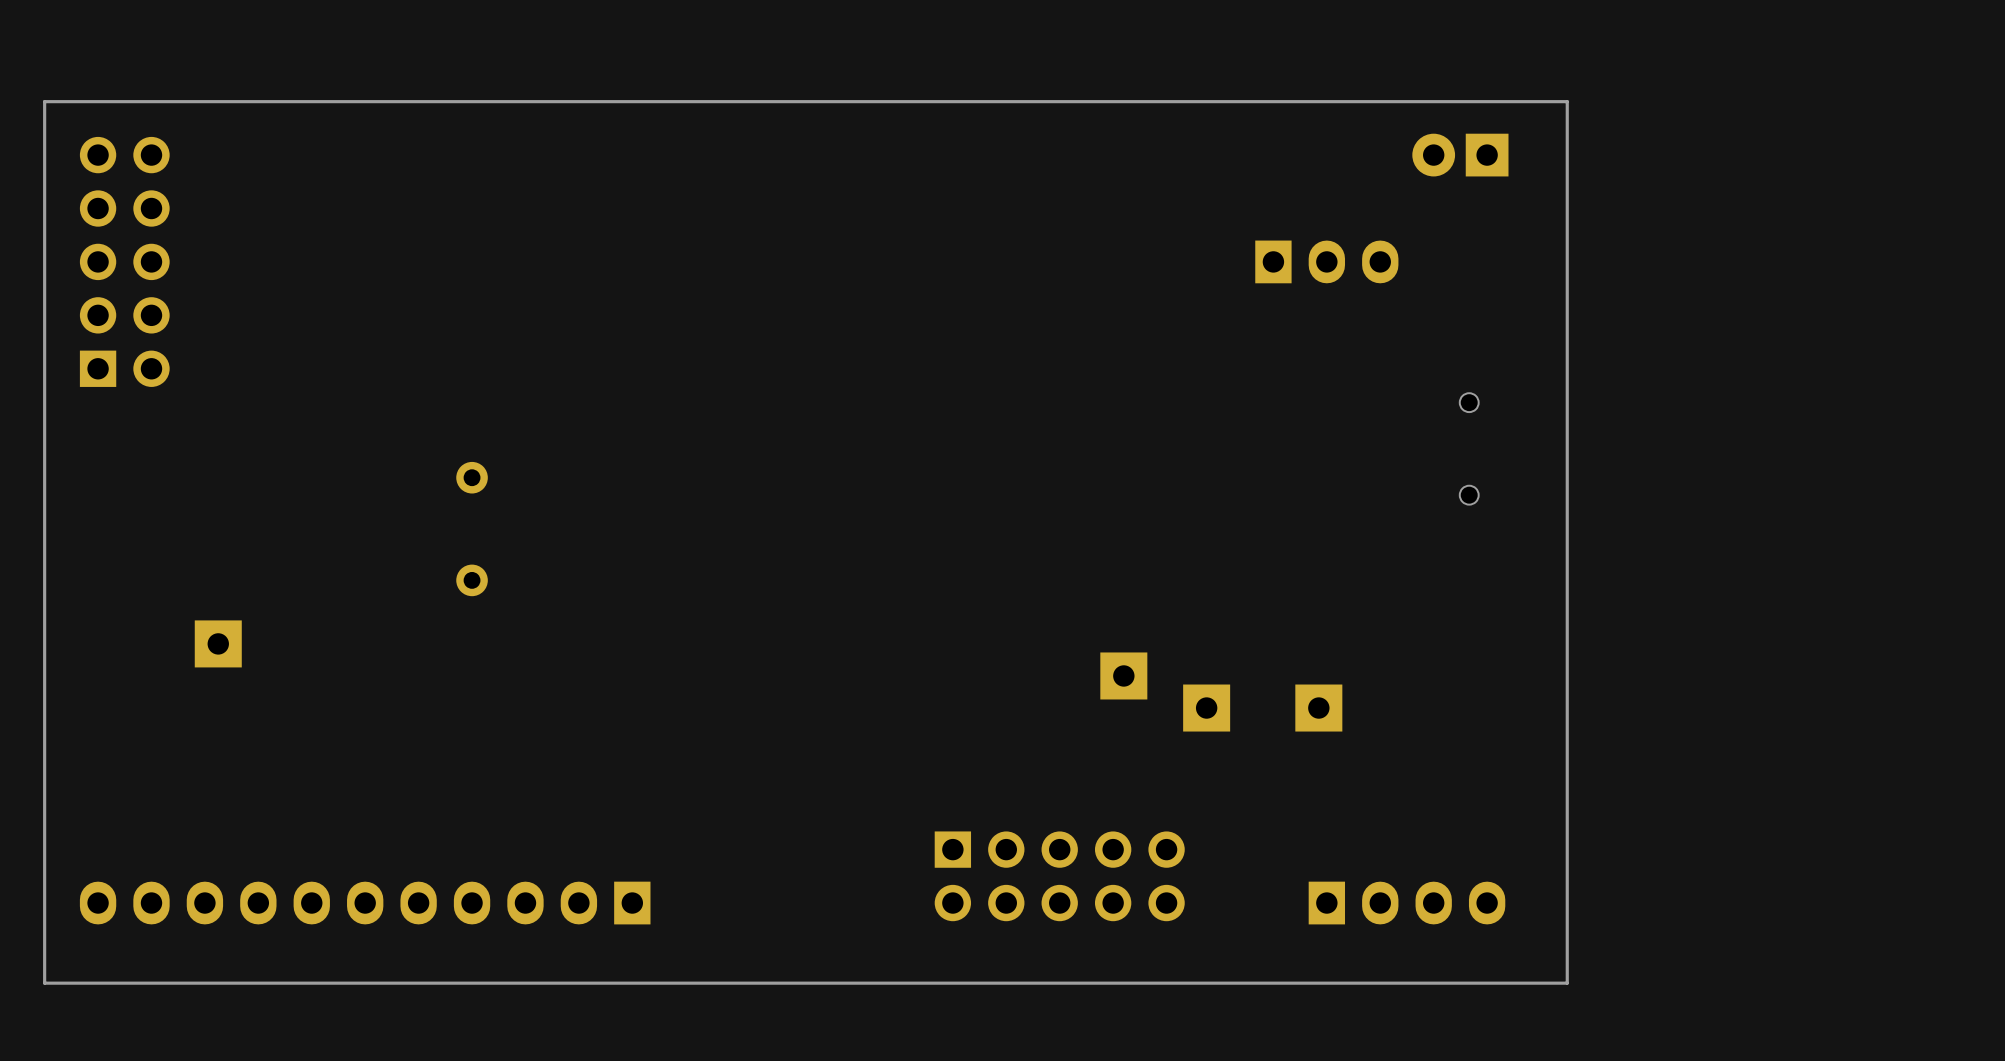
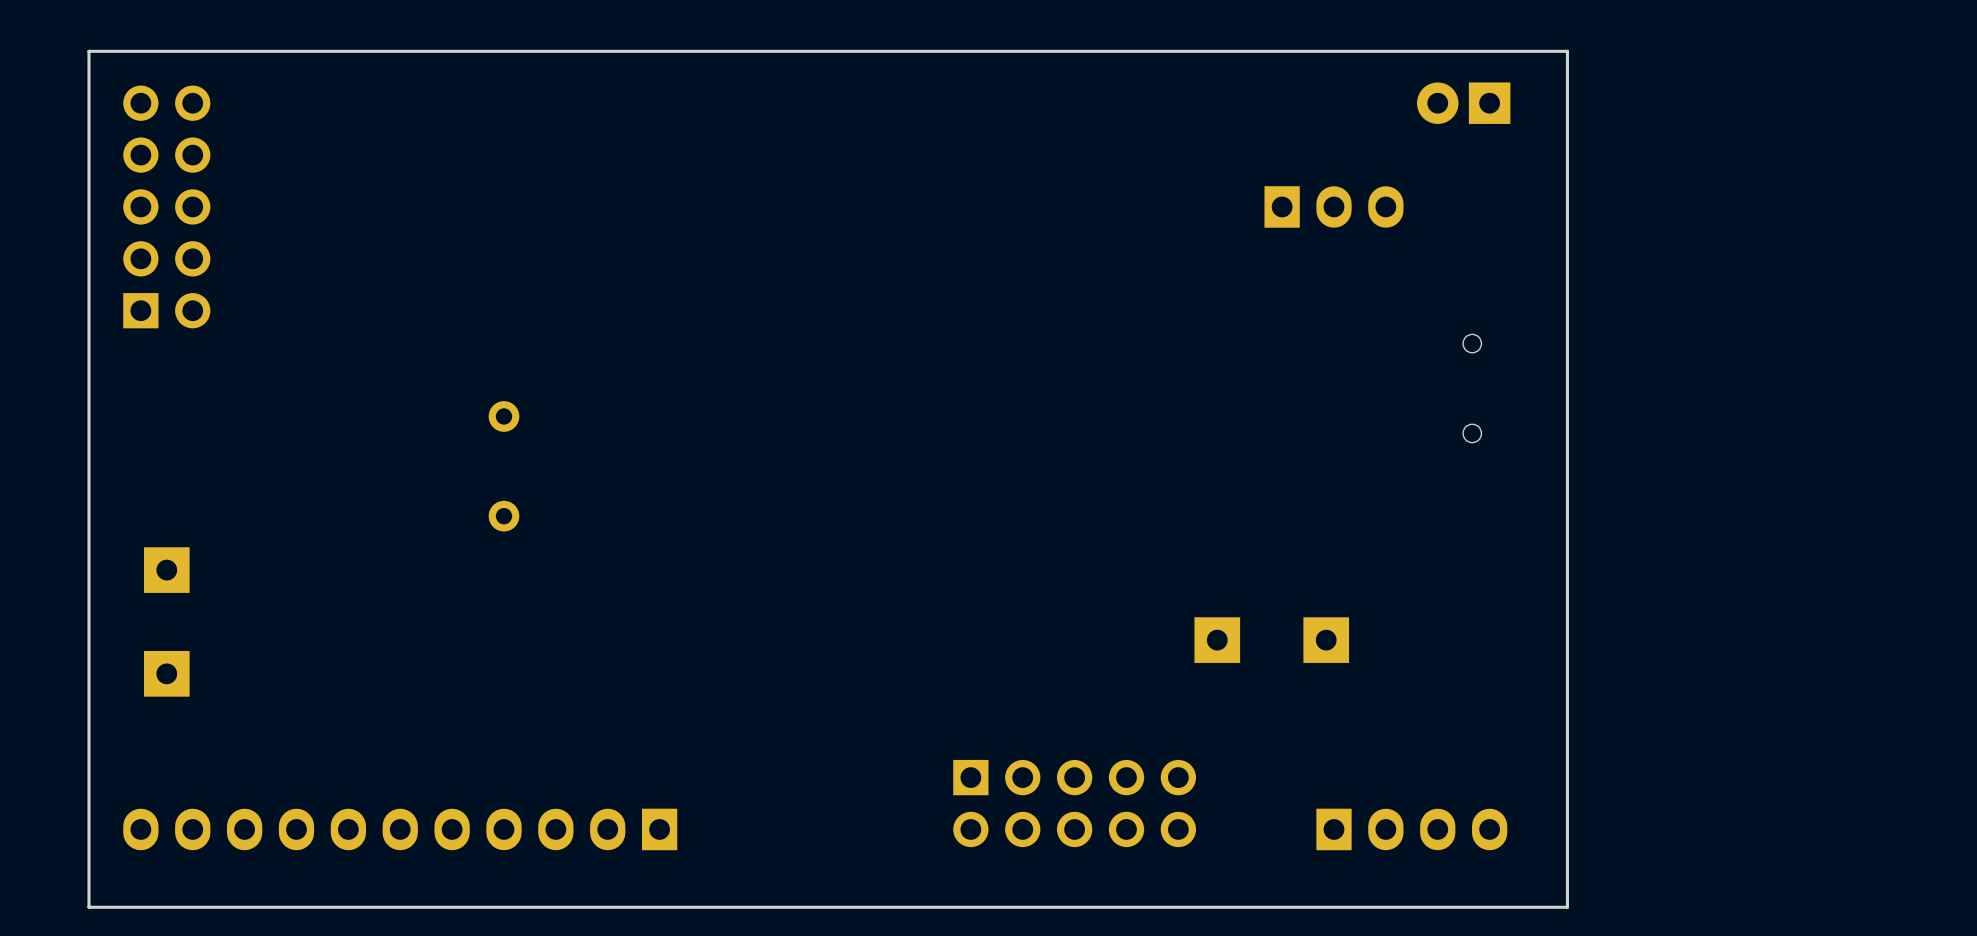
part: none -> (166, 570)
part: (218, 643) -> none
part: (1123, 675) -> none
part: none -> (166, 673)

